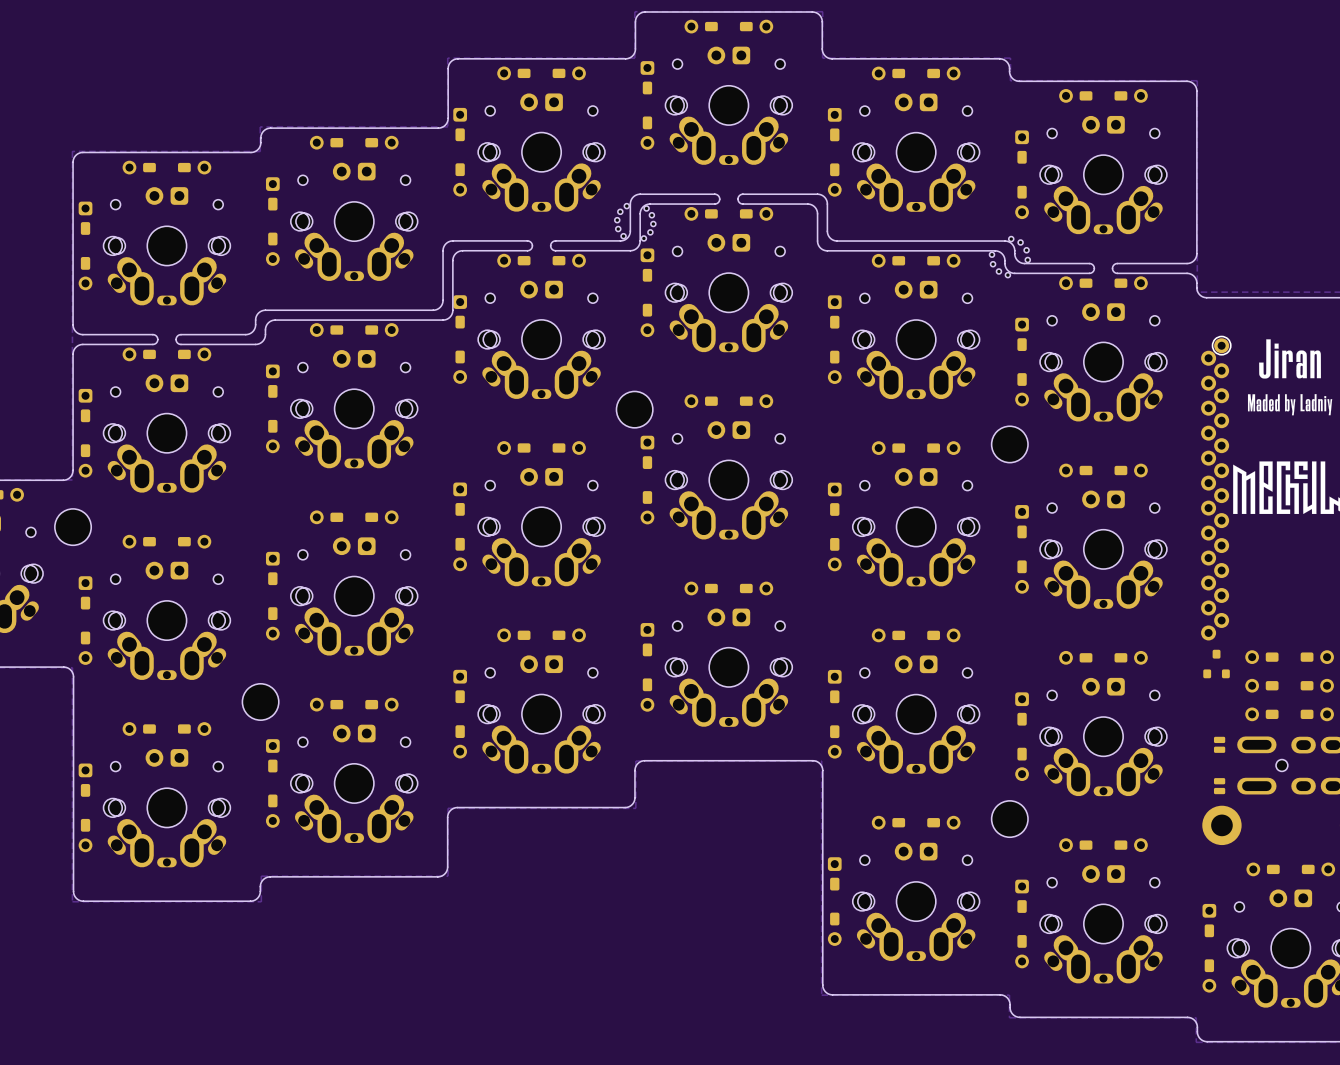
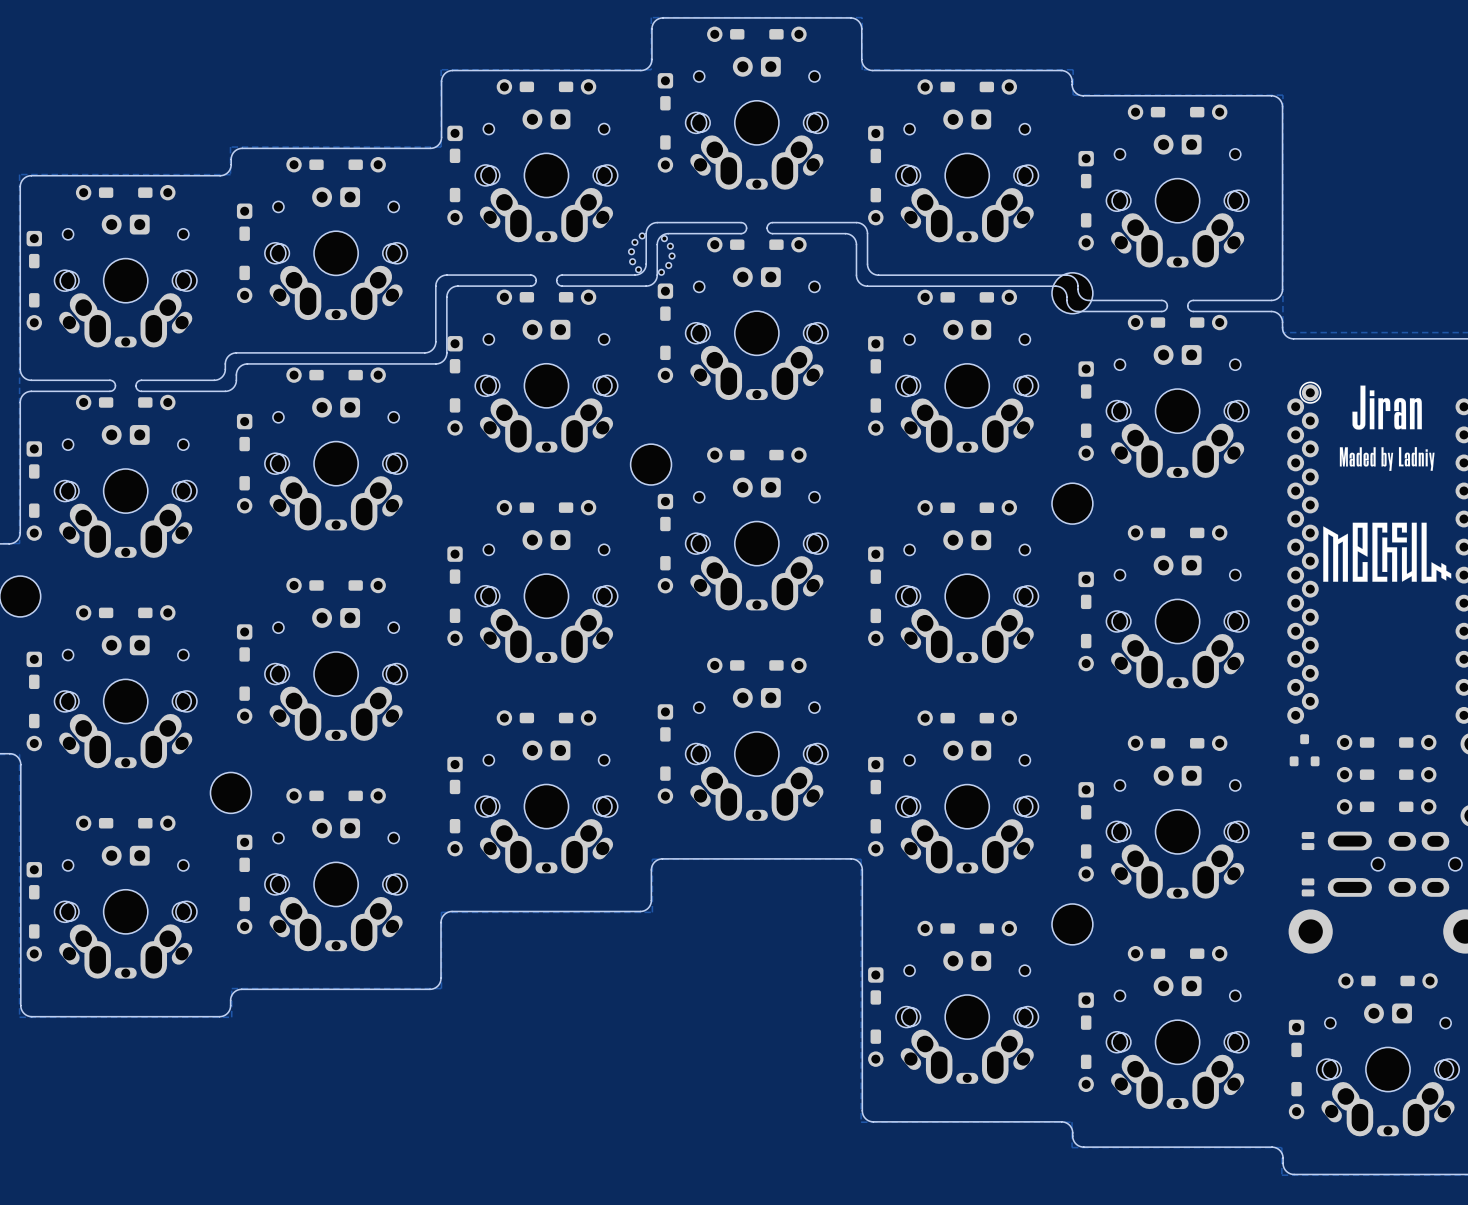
part: (1011, 239) -> none
part: (1020, 242) -> none
part: (1026, 250) -> none
part: (991, 254) -> none
part: none -> (1072, 293)
part: (1027, 259) -> none
part: (993, 264) -> none
part: (998, 271) -> none
part: (1007, 275) -> none

